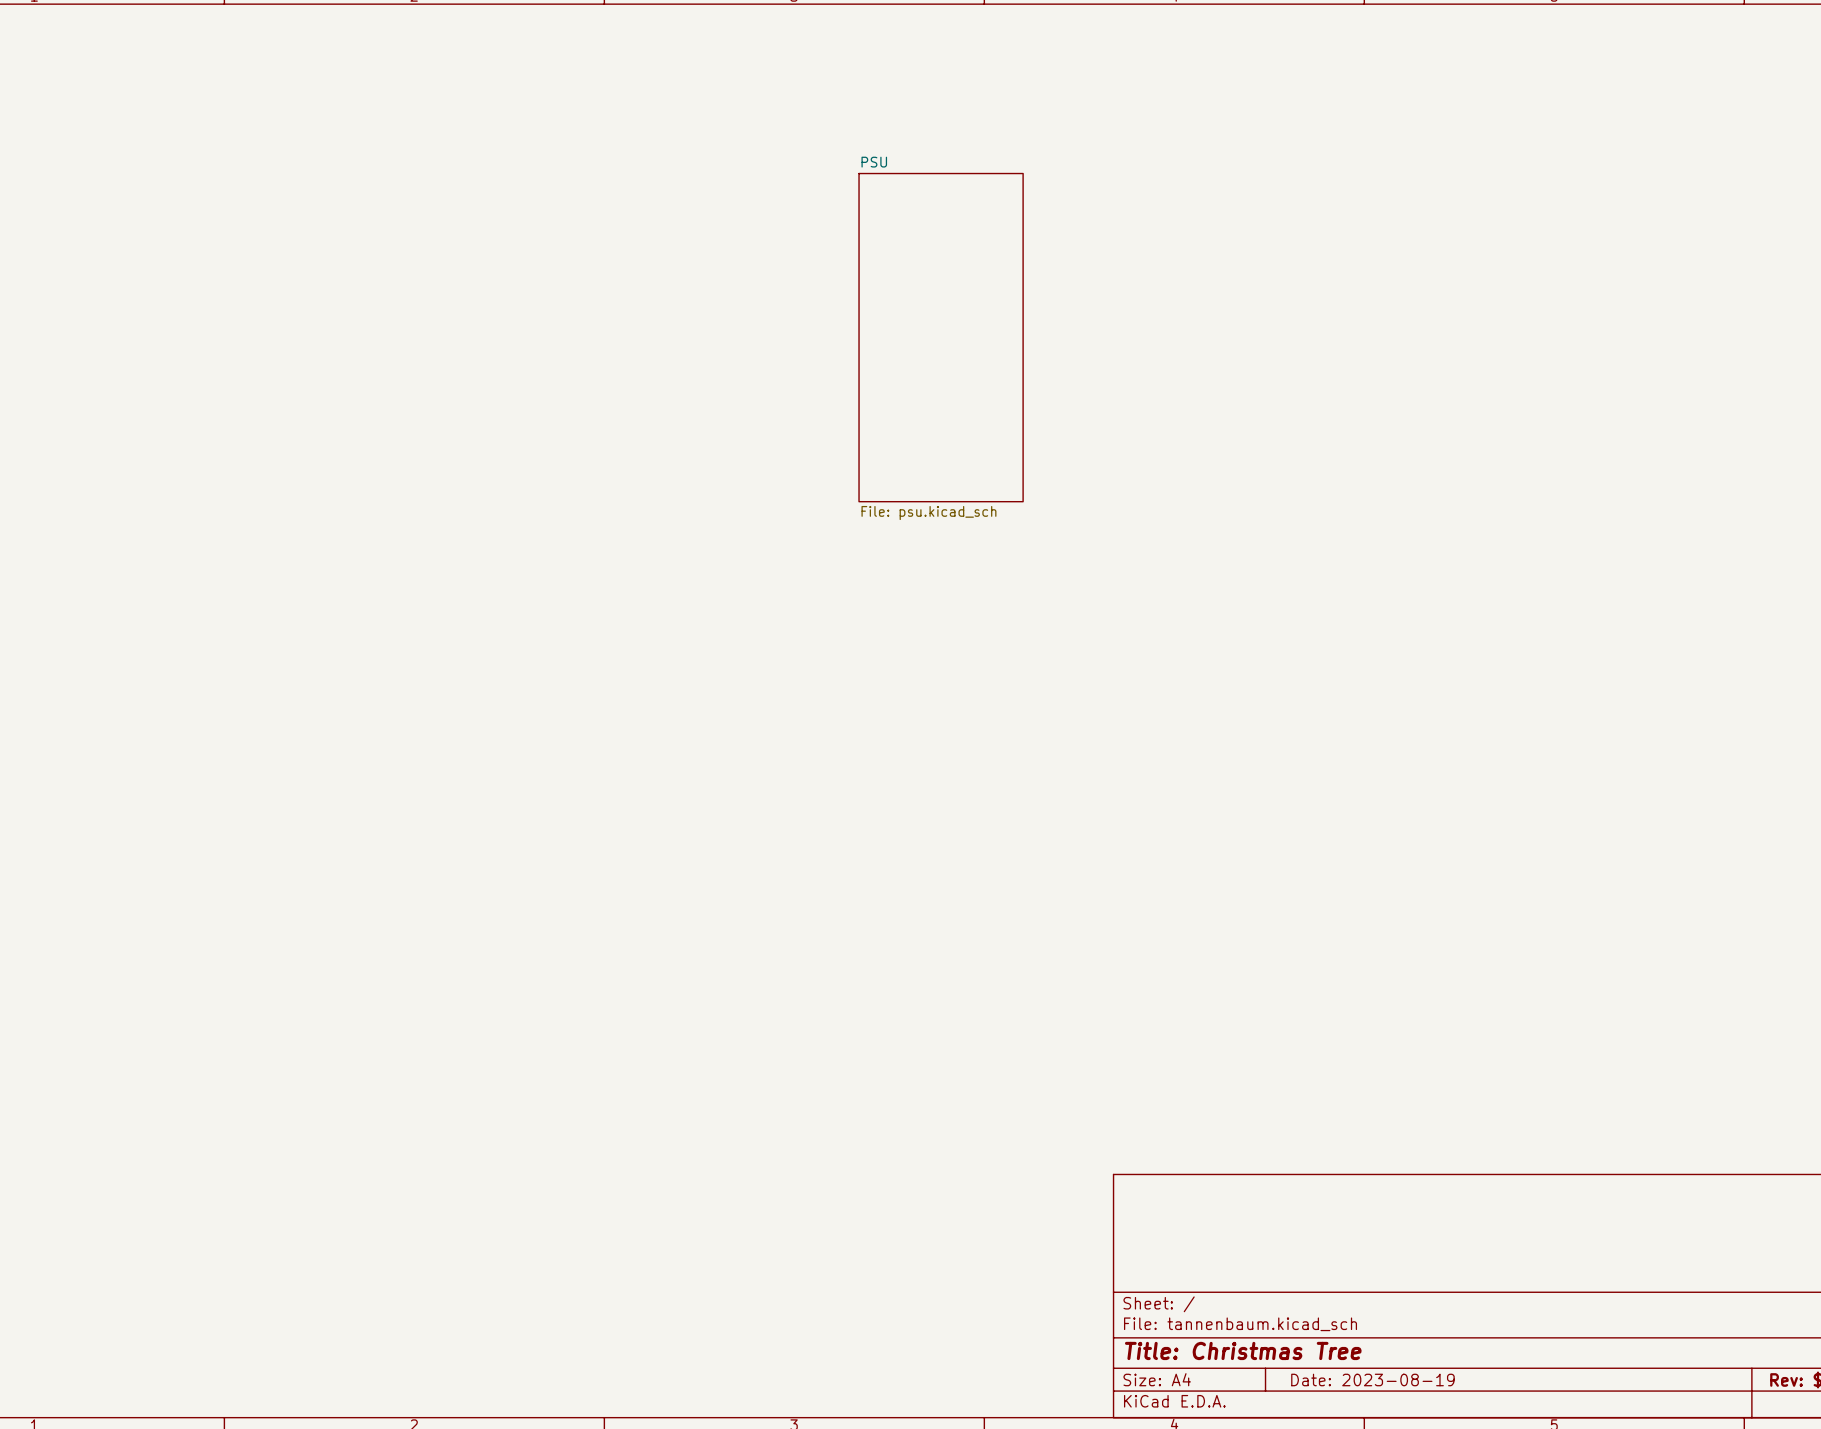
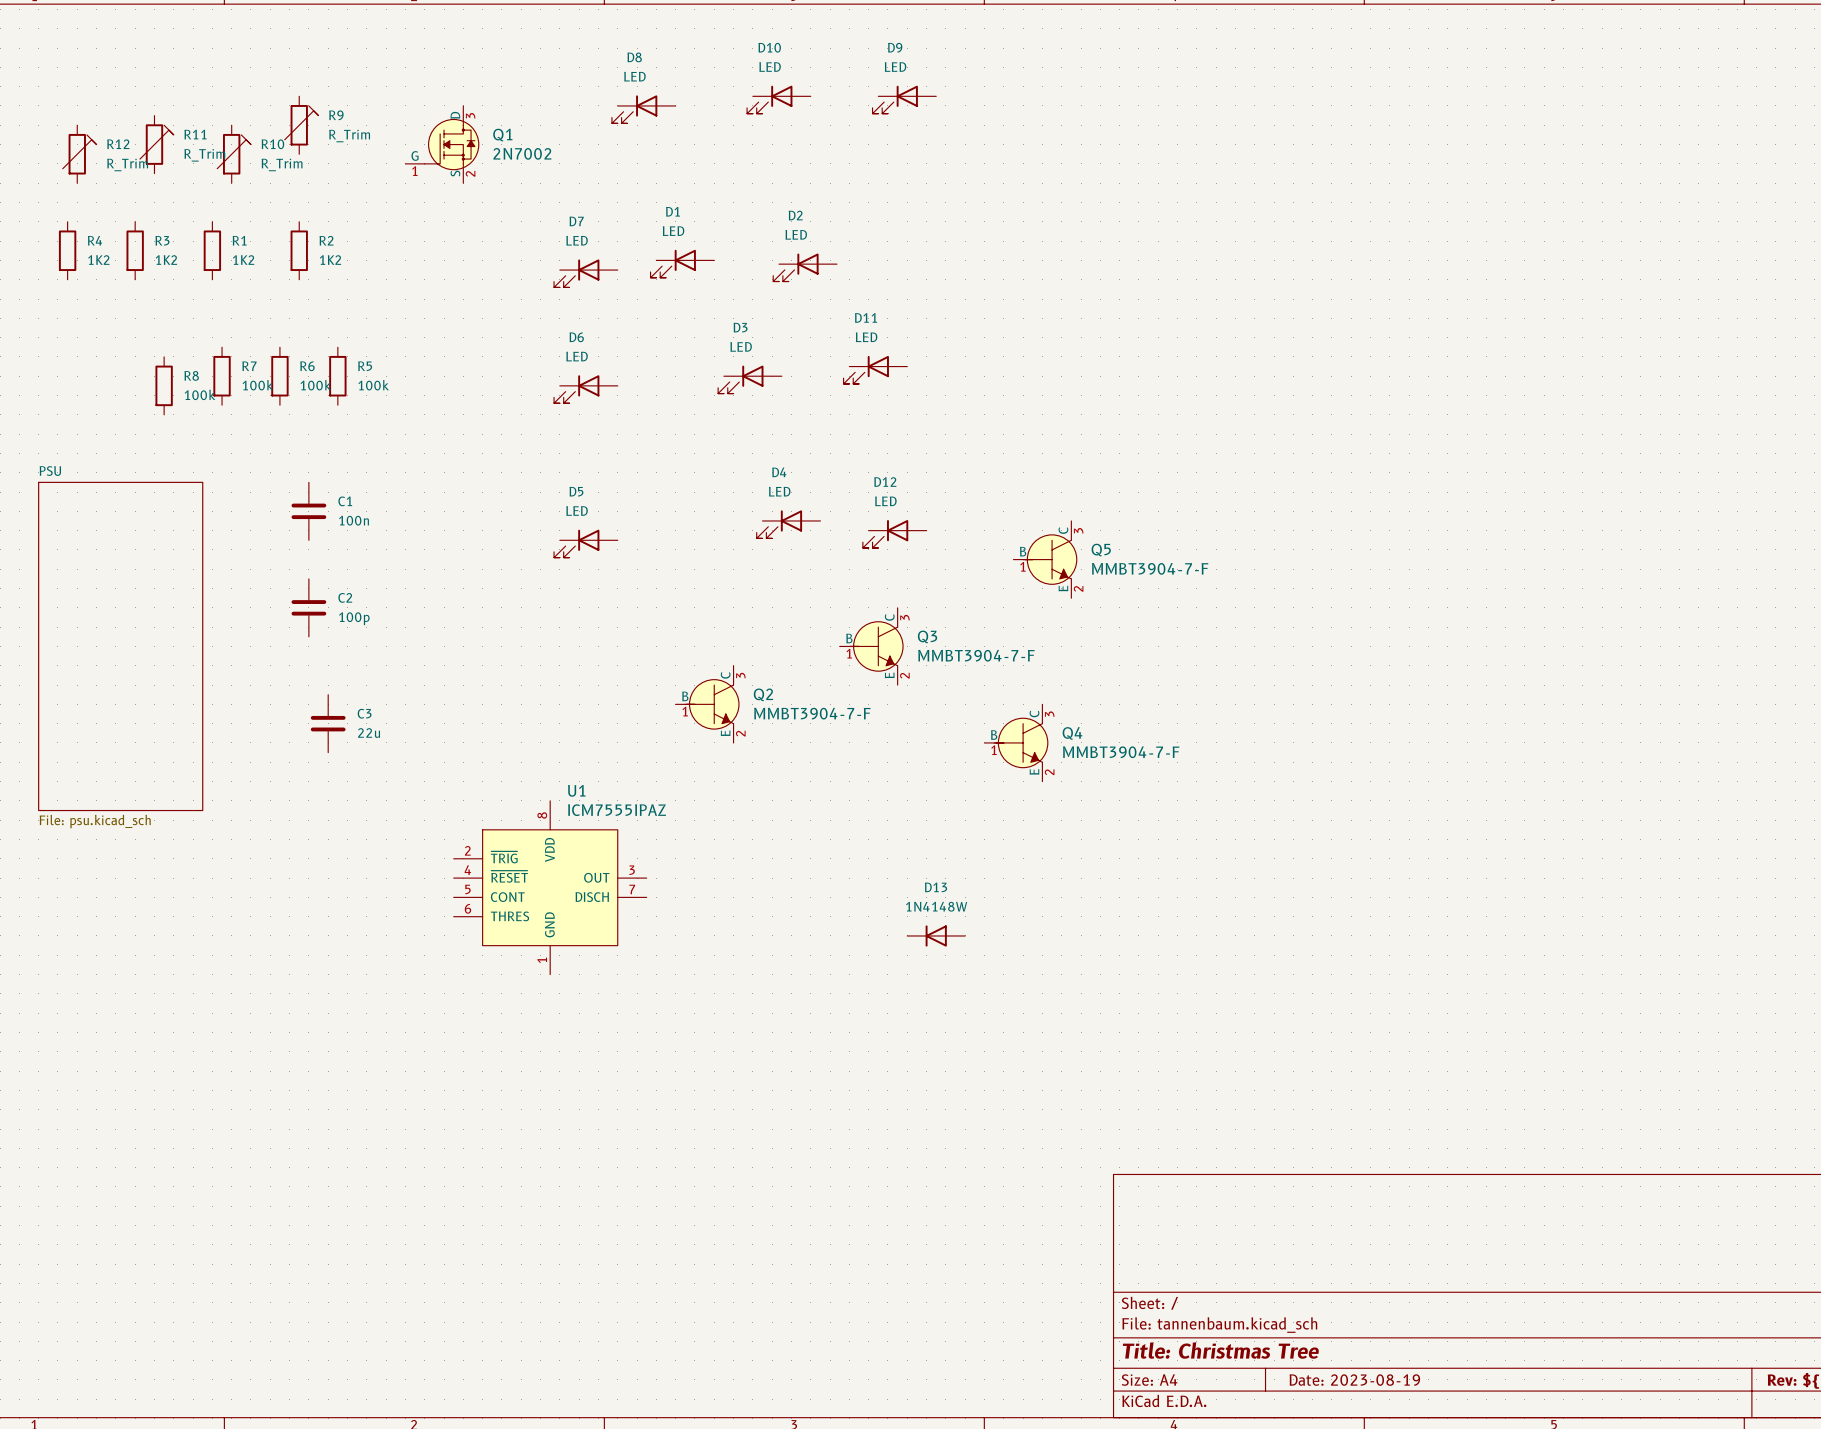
D10: none -> LED (778, 99)
D9: none -> LED (904, 99)
D8: none -> LED (643, 109)
R9: none -> R_Trim (301, 125)
R11: none -> R_Trim (156, 144)
Q1: none -> 2N7002 (442, 144)
R12: none -> R_Trim (79, 154)
R10: none -> R_Trim (234, 154)
R4: none -> 1K2 (67, 250)
R3: none -> 1K2 (135, 250)
R1: none -> 1K2 (212, 250)
R2: none -> 1K2 (299, 250)
D1: none -> LED (682, 263)
D2: none -> LED (805, 267)
D7: none -> LED (585, 273)
sheet PSU: File: psu.kicad_sch (941, 337) -> none
D11: none -> LED (875, 369)
R7: none -> 100k (222, 376)
R6: none -> 100k (279, 376)
R5: none -> 100k (337, 376)
D3: none -> LED (749, 379)
R8: none -> 100k (164, 385)
D6: none -> LED (585, 389)
C1: none -> 100n (308, 511)
D4: none -> LED (788, 524)
D12: none -> LED (894, 534)
D5: none -> LED (585, 543)
Q5: none -> MMBT3904-7-F (1045, 559)
C2: none -> 100p (308, 607)
sheet PSU: none -> File: psu.kicad_sch (120, 646)
Q3: none -> MMBT3904-7-F (871, 646)
Q2: none -> MMBT3904-7-F (707, 704)
C3: none -> 22u (328, 723)
Q4: none -> MMBT3904-7-F (1016, 742)
U1: none -> ICM7555IPAZ (550, 887)
D13: none -> 1N4148W (936, 935)

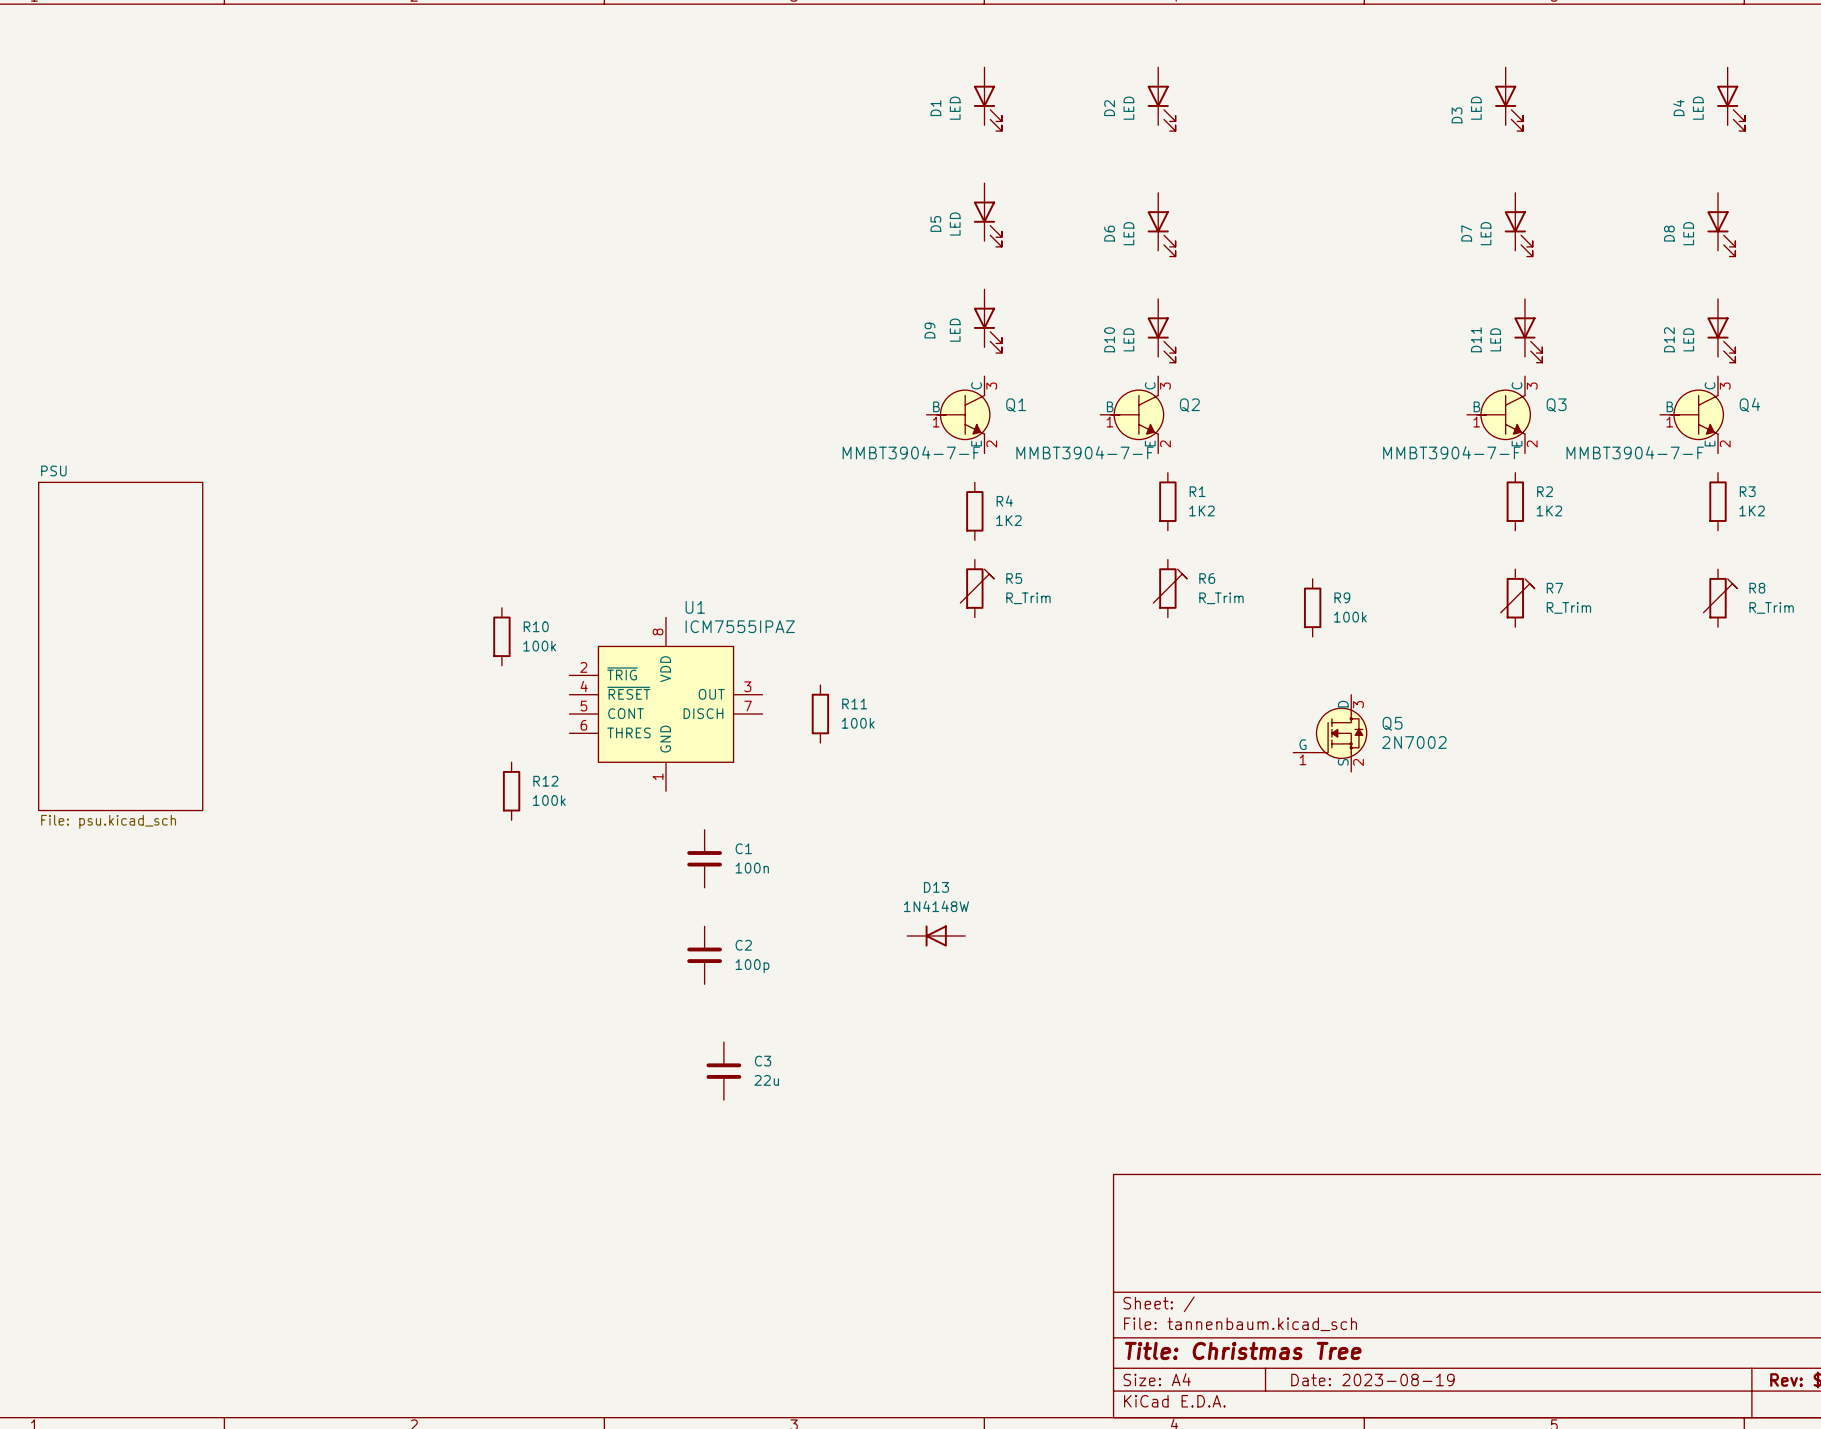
R9 symbol: [284, 96, 319, 155] -> [1303, 578, 1322, 637]
D10 rotation: 0° (769, 99) -> 90° counterclockwise (1161, 340)
D10 position: (778, 99) -> (1161, 330)
D9 rotation: 0° (895, 99) -> 90° counterclockwise (987, 330)
D9 position: (904, 99) -> (987, 321)
Q1 symbol: [405, 105, 479, 184] -> [926, 376, 990, 454]
D8 rotation: 0° (634, 109) -> 90° counterclockwise (1721, 233)
D8 position: (643, 109) -> (1721, 224)
R11 symbol: [139, 115, 174, 174] -> [811, 685, 830, 743]
R12 symbol: [62, 125, 97, 184] -> [502, 762, 521, 821]
R10 symbol: [217, 125, 251, 184] -> [493, 607, 511, 666]
R9 value: R_Trim (349, 136) -> 100k (1350, 617)
Q1 value: 2N7002 (522, 153) -> MMBT3904-7-F (911, 452)
R11 value: R_Trim (204, 155) -> 100k (858, 723)
R12 value: R_Trim (127, 164) -> 100k (549, 800)
R10 value: R_Trim (282, 164) -> 100k (539, 646)
D2 name position: D2 (795, 215) -> D2 (1109, 108)
D2 value position: LED (796, 234) -> LED (1128, 108)
R4 position: (67, 250) -> (974, 511)
R3 position: (135, 250) -> (1718, 501)
R1 position: (212, 250) -> (1167, 501)
R2 position: (299, 250) -> (1515, 501)
D2 symbol: [773, 253, 837, 282] -> [1147, 67, 1176, 132]
D1 rotation: 0° (673, 263) -> 90° counterclockwise (987, 108)
D1 position: (682, 263) -> (987, 99)
D7 rotation: 0° (576, 273) -> 90° counterclockwise (1518, 233)
D7 position: (585, 273) -> (1518, 224)
R7 symbol: [213, 347, 231, 406] -> [1500, 569, 1535, 628]
R6 symbol: [271, 347, 289, 406] -> [1153, 559, 1188, 618]
R5 symbol: [329, 347, 347, 406] -> [960, 559, 995, 618]
R8 symbol: [155, 356, 173, 415] -> [1703, 569, 1738, 628]
D11 rotation: 0° (866, 369) -> 90° counterclockwise (1528, 340)
D11 position: (875, 369) -> (1528, 330)
D3 rotation: 0° (740, 379) -> 90° counterclockwise (1509, 108)
D3 position: (749, 379) -> (1509, 99)
R7 value: 100k (257, 385) -> R_Trim (1568, 607)
R6 value: 100k (315, 385) -> R_Trim (1221, 598)
R5 value: 100k (373, 385) -> R_Trim (1028, 598)
D6 rotation: 0° (576, 389) -> 90° counterclockwise (1161, 233)
D6 position: (585, 389) -> (1161, 224)
R8 value: 100k (199, 394) -> R_Trim (1771, 607)
C1 position: (308, 511) -> (704, 858)
Q5 symbol: [1013, 520, 1077, 599] -> [1293, 694, 1367, 772]
D4 rotation: 0° (779, 524) -> 90° counterclockwise (1731, 108)
D4 position: (788, 524) -> (1731, 99)
D12 rotation: 0° (885, 534) -> 90° counterclockwise (1721, 340)
D12 position: (894, 534) -> (1721, 330)
D5 rotation: 0° (576, 543) -> 90° counterclockwise (987, 224)
D5 position: (585, 543) -> (987, 215)
Q5 value: MMBT3904-7-F (1150, 568) -> 2N7002 (1414, 742)
C2 position: (308, 607) -> (704, 955)
Q3 position: (871, 646) -> (1498, 414)
Q3 value position: MMBT3904-7-F (976, 655) -> MMBT3904-7-F (1451, 452)
Q2 position: (707, 704) -> (1131, 414)
Q2 value position: MMBT3904-7-F (812, 713) -> MMBT3904-7-F (1085, 452)
C3 position: (328, 723) -> (723, 1071)
Q4 position: (1016, 742) -> (1691, 414)
Q4 value position: MMBT3904-7-F (1121, 752) -> MMBT3904-7-F (1635, 452)
U1 position: (550, 887) -> (666, 704)

